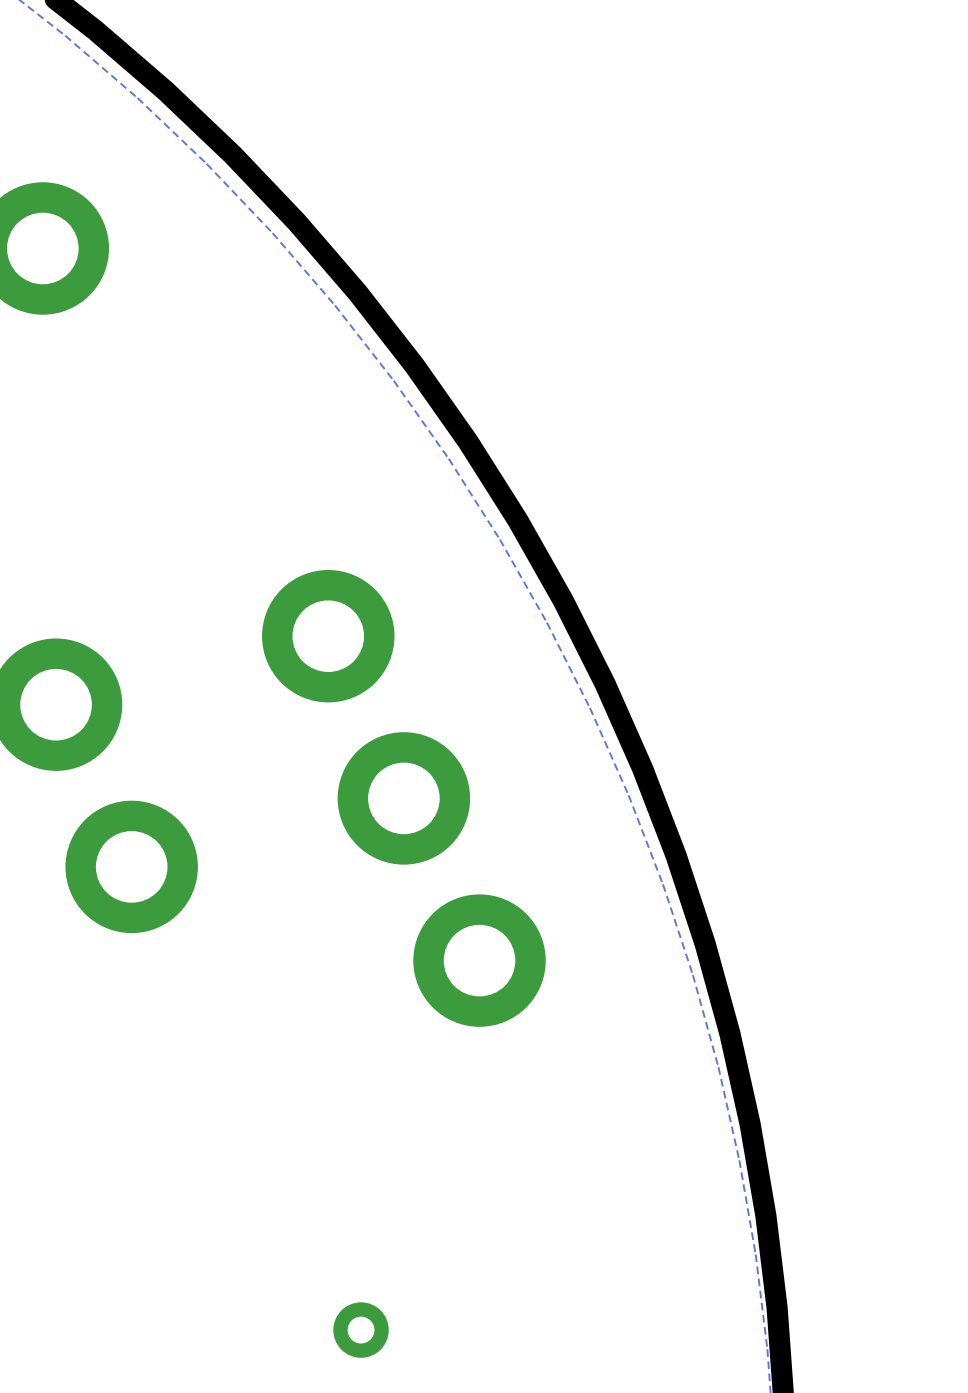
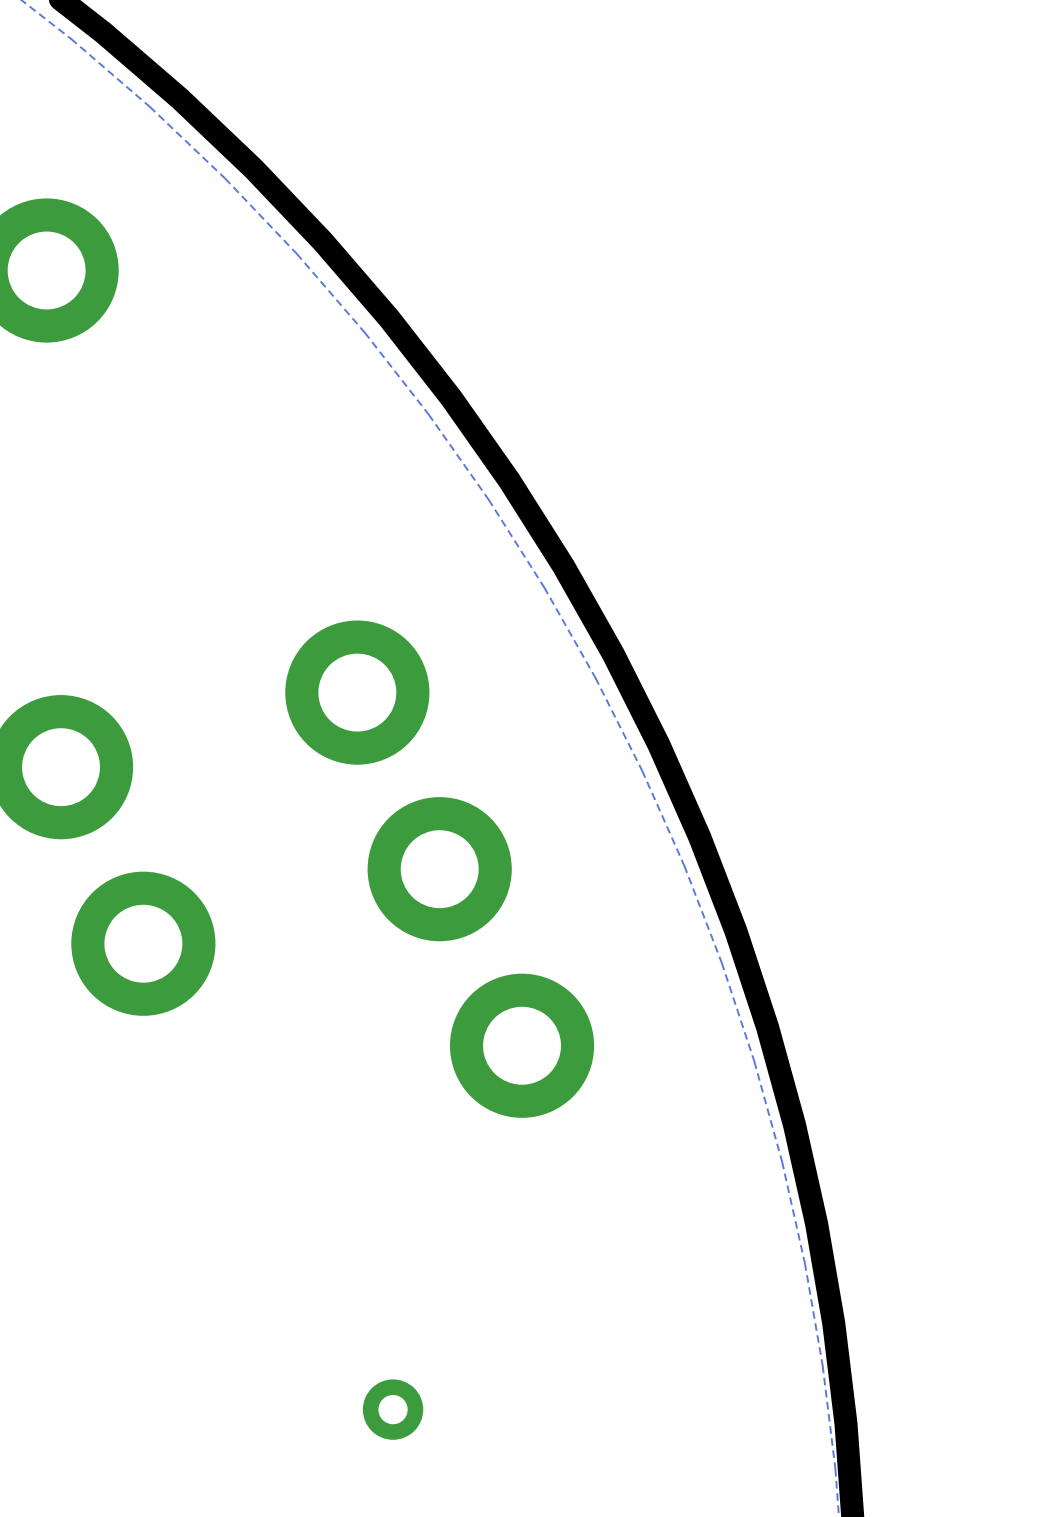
via position: (361, 1330) -> (393, 1409)

